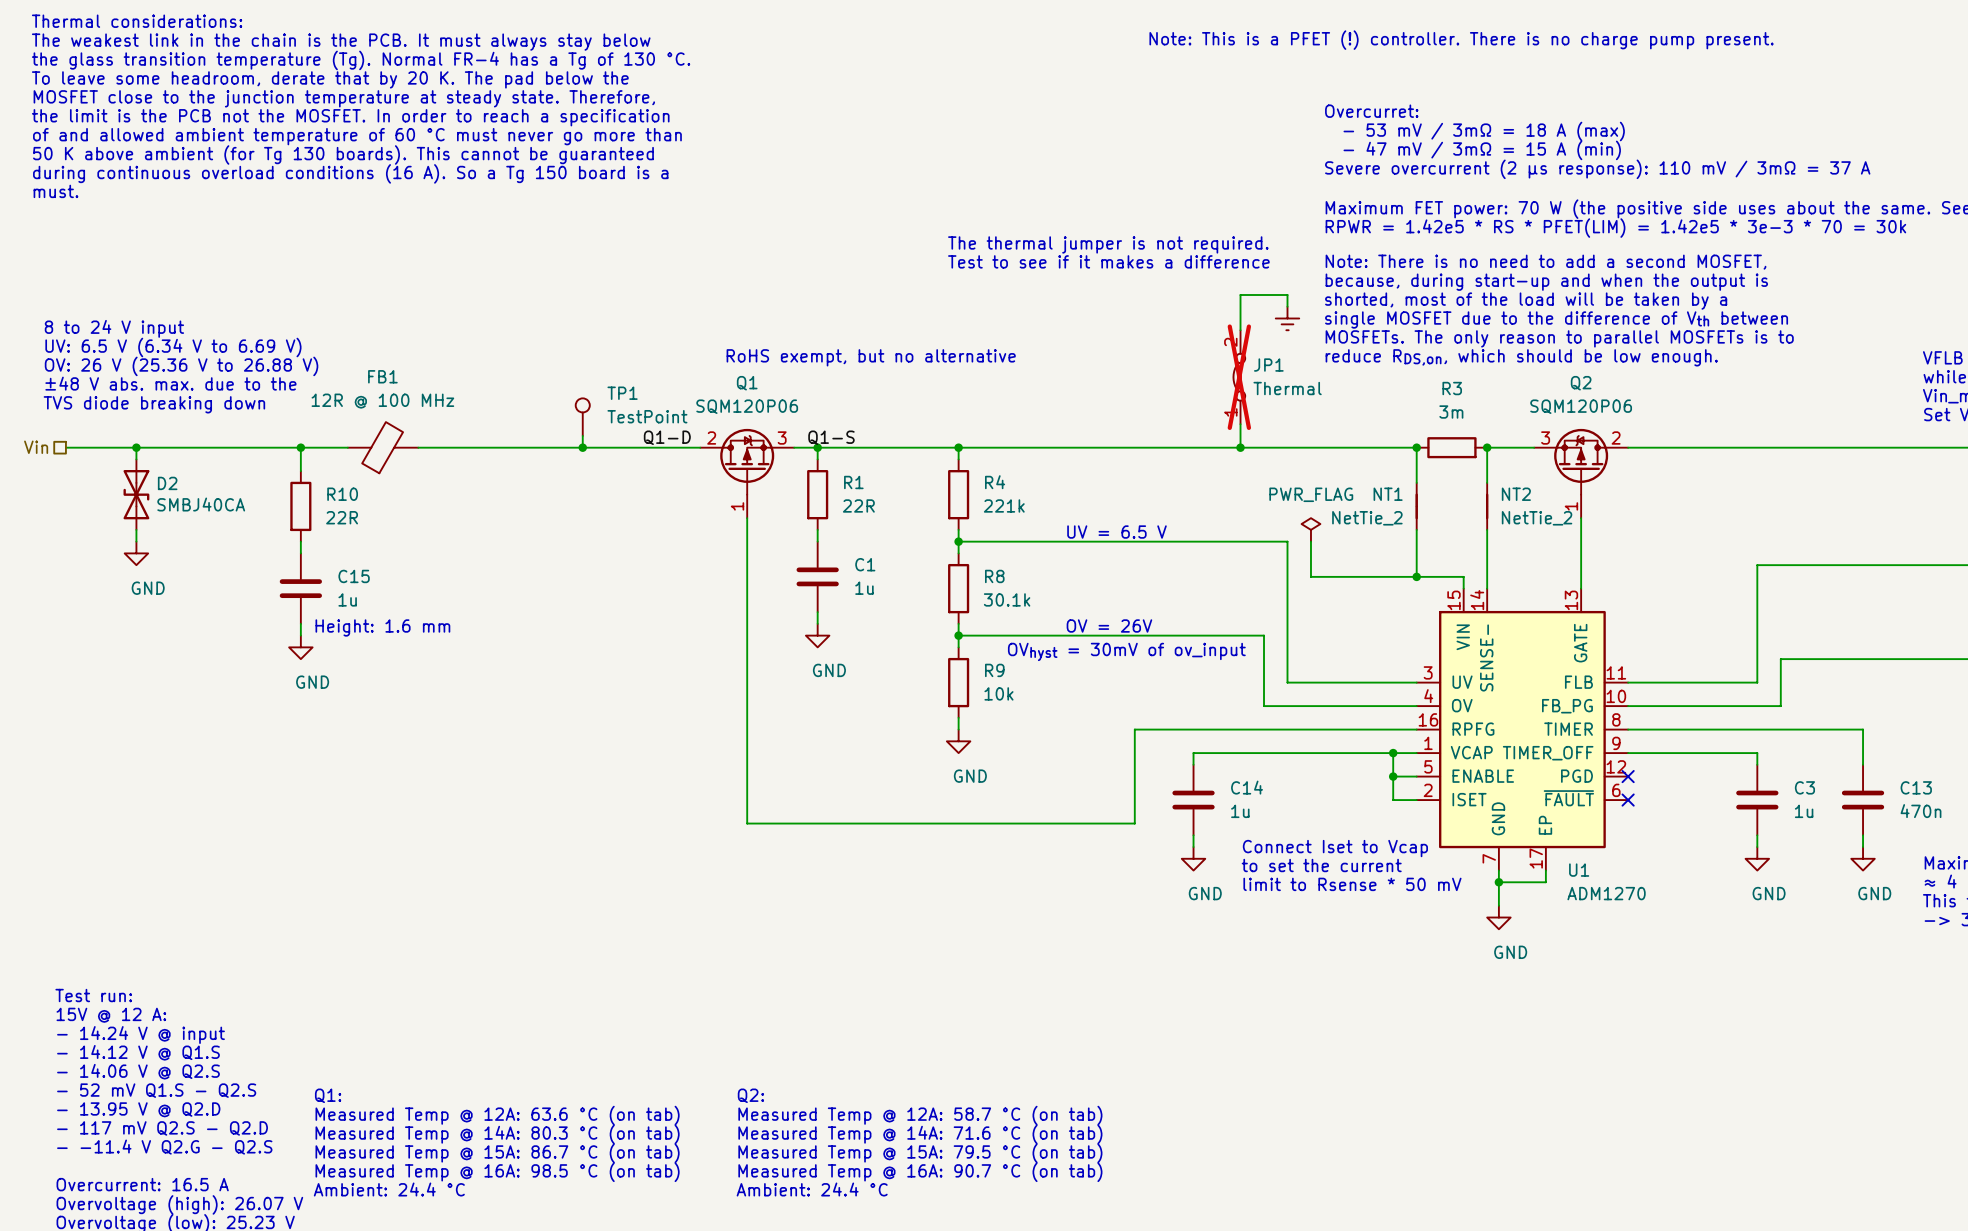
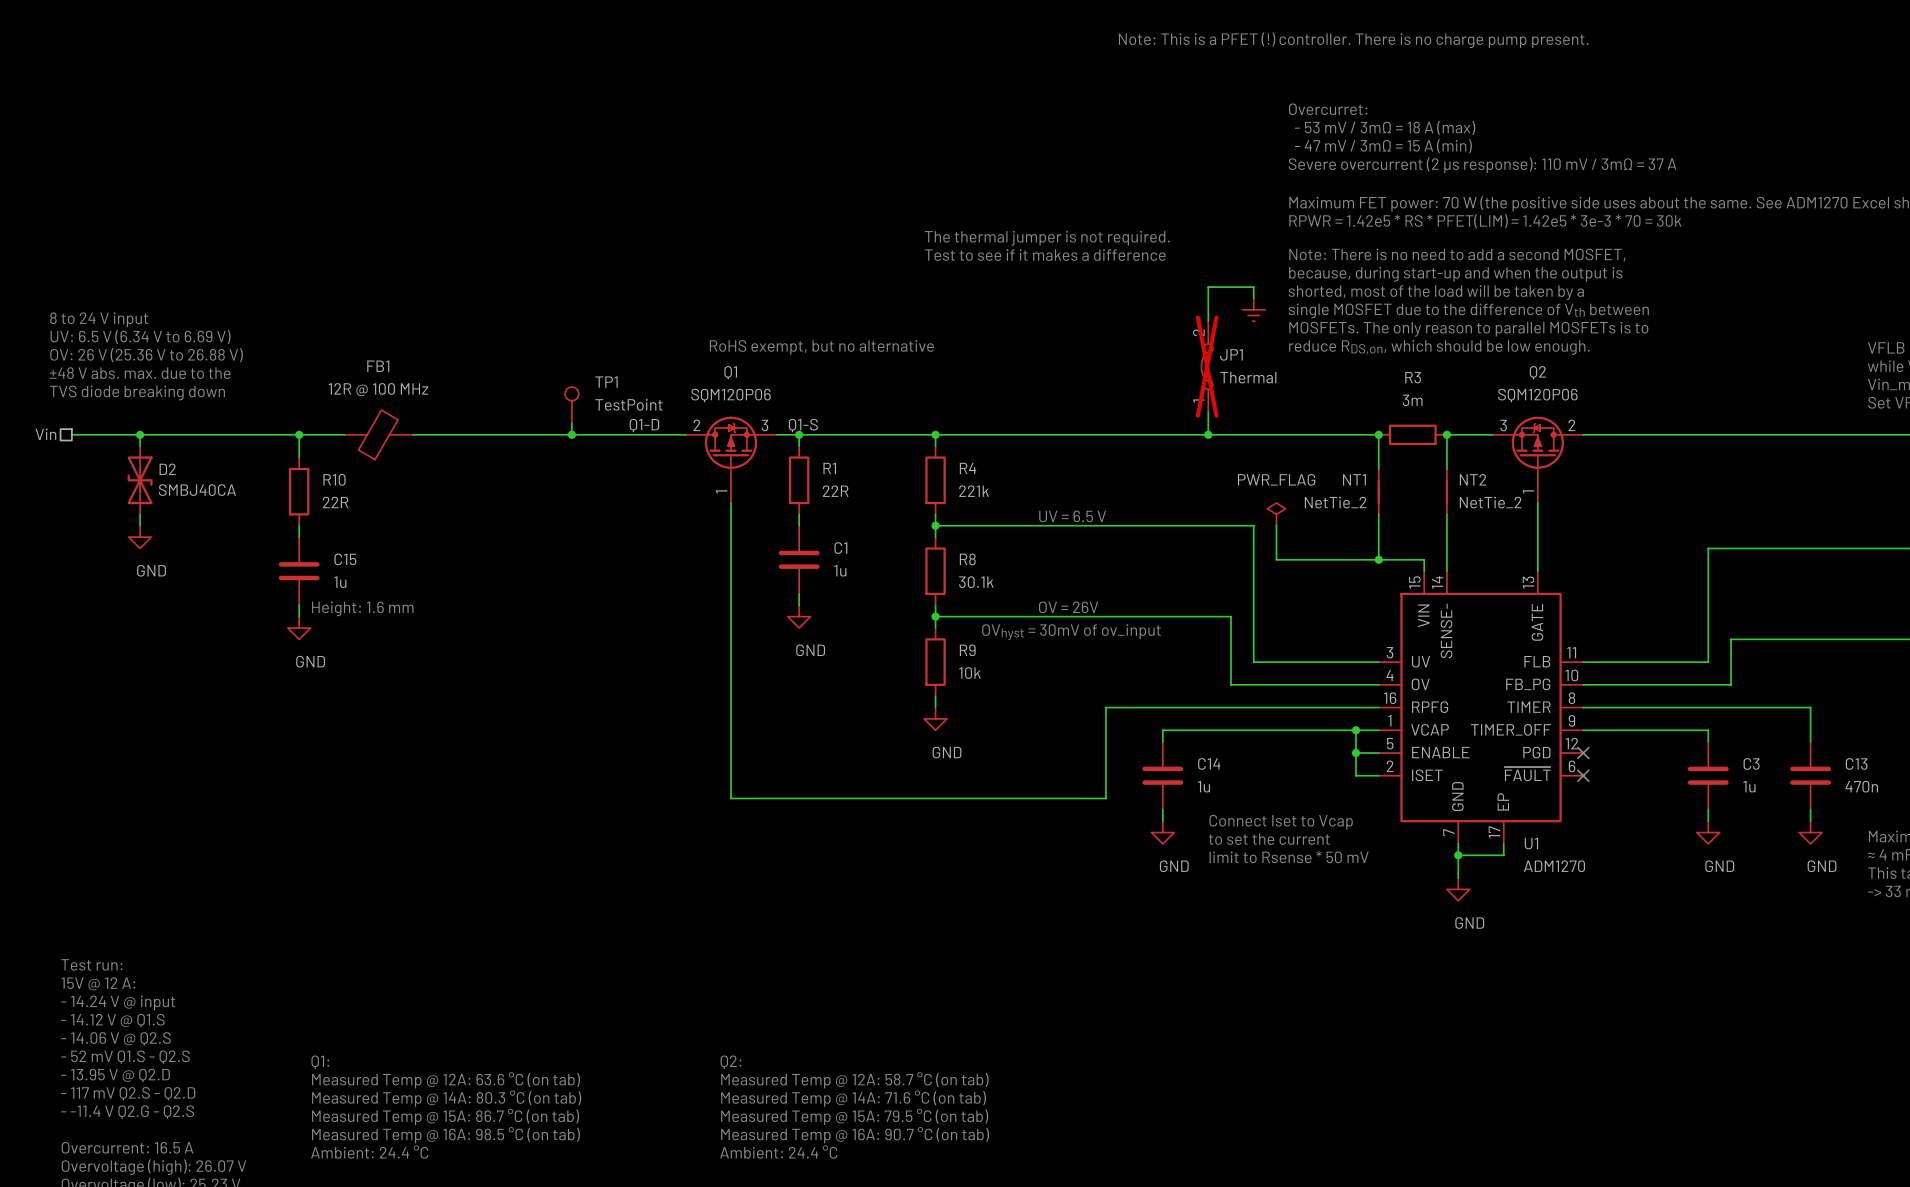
text: Thermal considerations: (137, 21) -> none
text: The weakest link in the chain is the PCB. It must always stay below (341, 42) -> none
text: the glass transition temperature (Tg). Normal FR-4 has a Tg of 130 °C. (361, 60) -> none
text: To leave some headroom, derate that by 20 K. The pad below the (330, 79) -> none
text: MOSFET close to the junction temperature at steady state. Therefore, (344, 98) -> none
text: the limit is the PCB not the MOSFET. In order to reach a specification (350, 117) -> none
text: of and allowed ambient temperature of 60 °C must never go more than (357, 136) -> none
text: 50 K above ambient (for Tg 130 boards). This cannot be guaranteed (343, 154) -> none
text: during continuous overload conditions (16 A). So a Tg 150 board is a (350, 173) -> none
text: must. (55, 191) -> none

